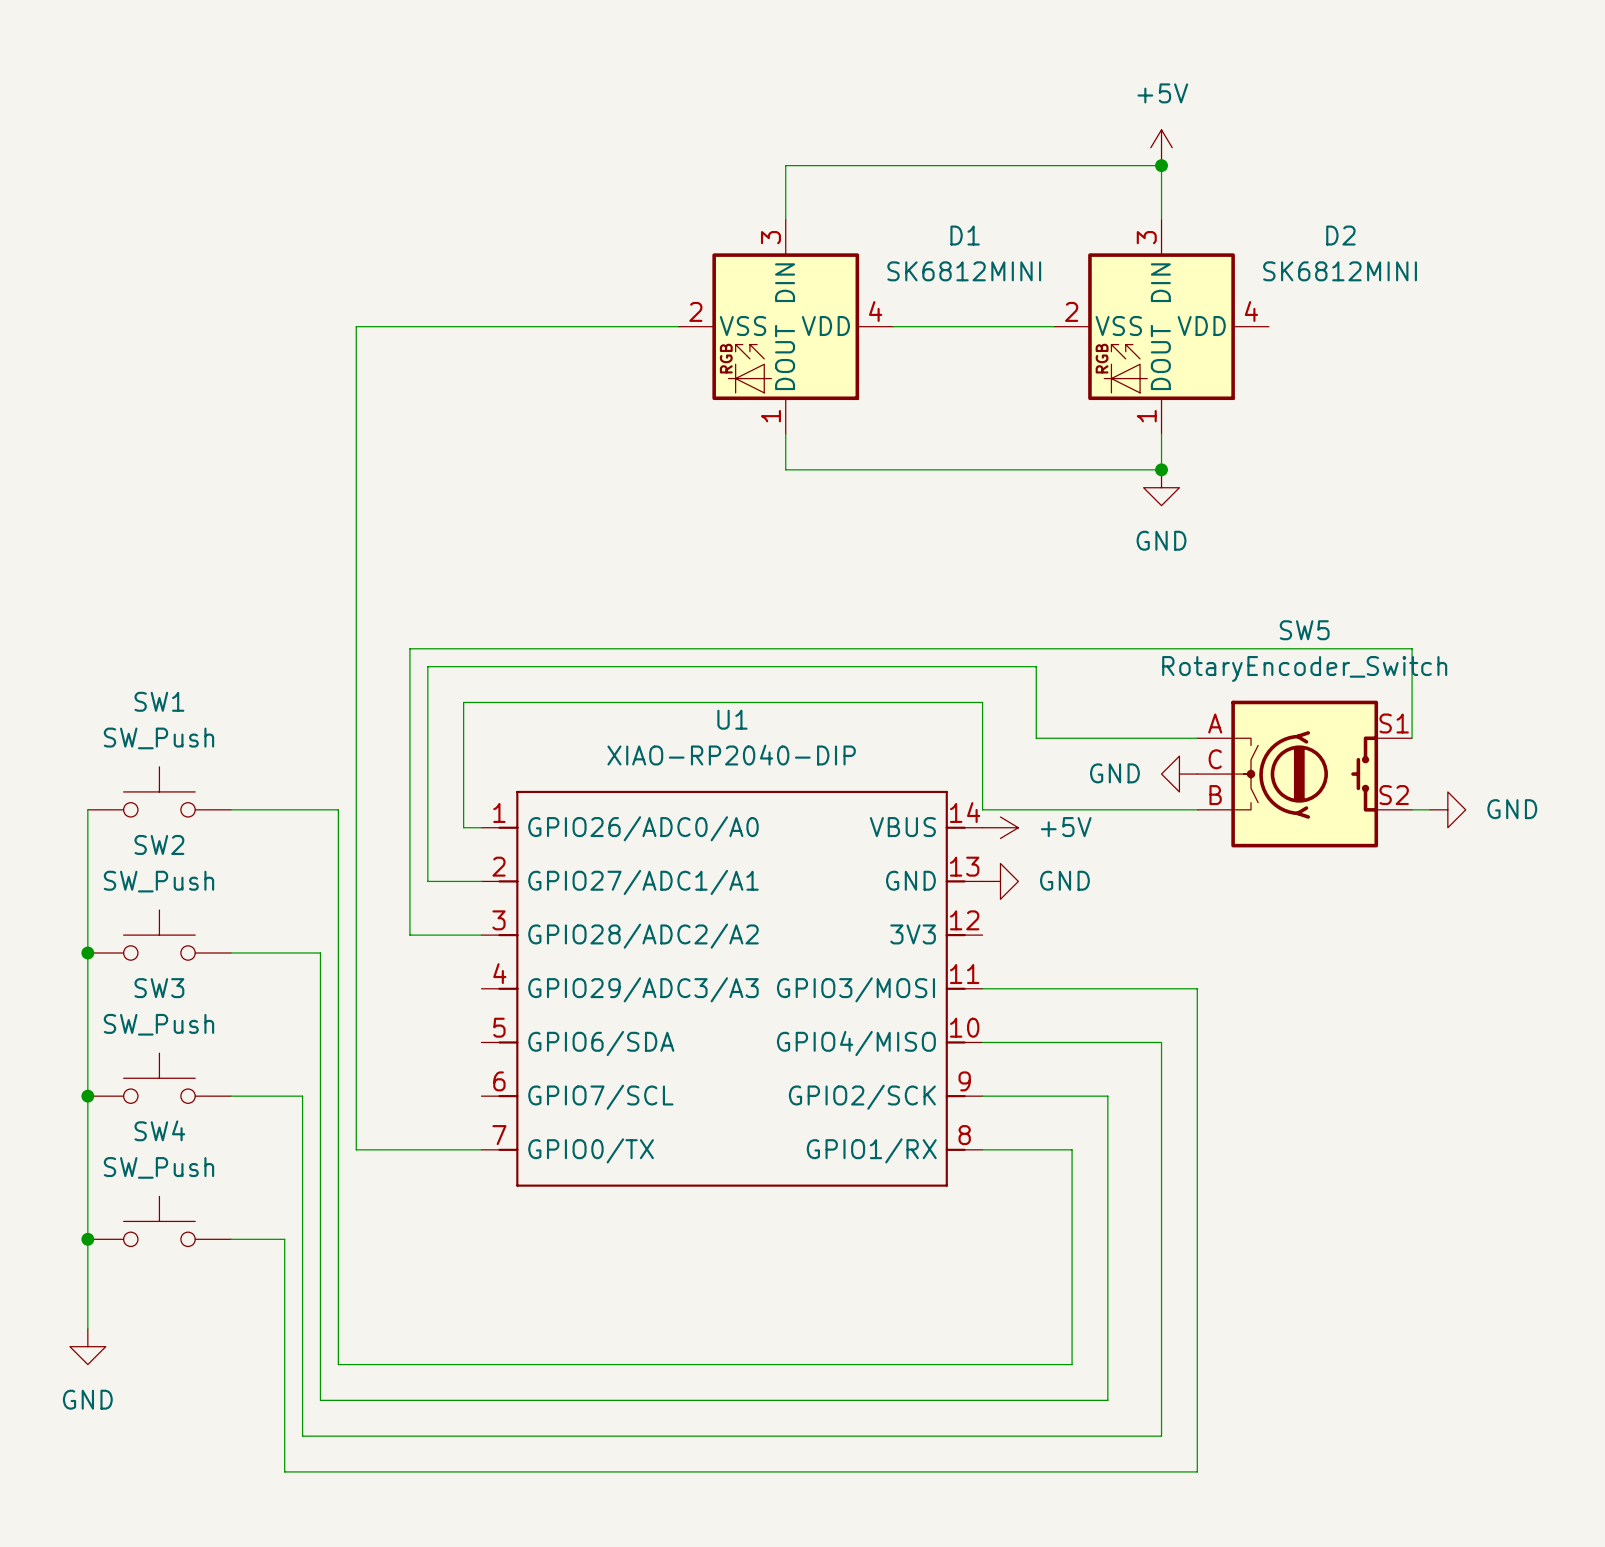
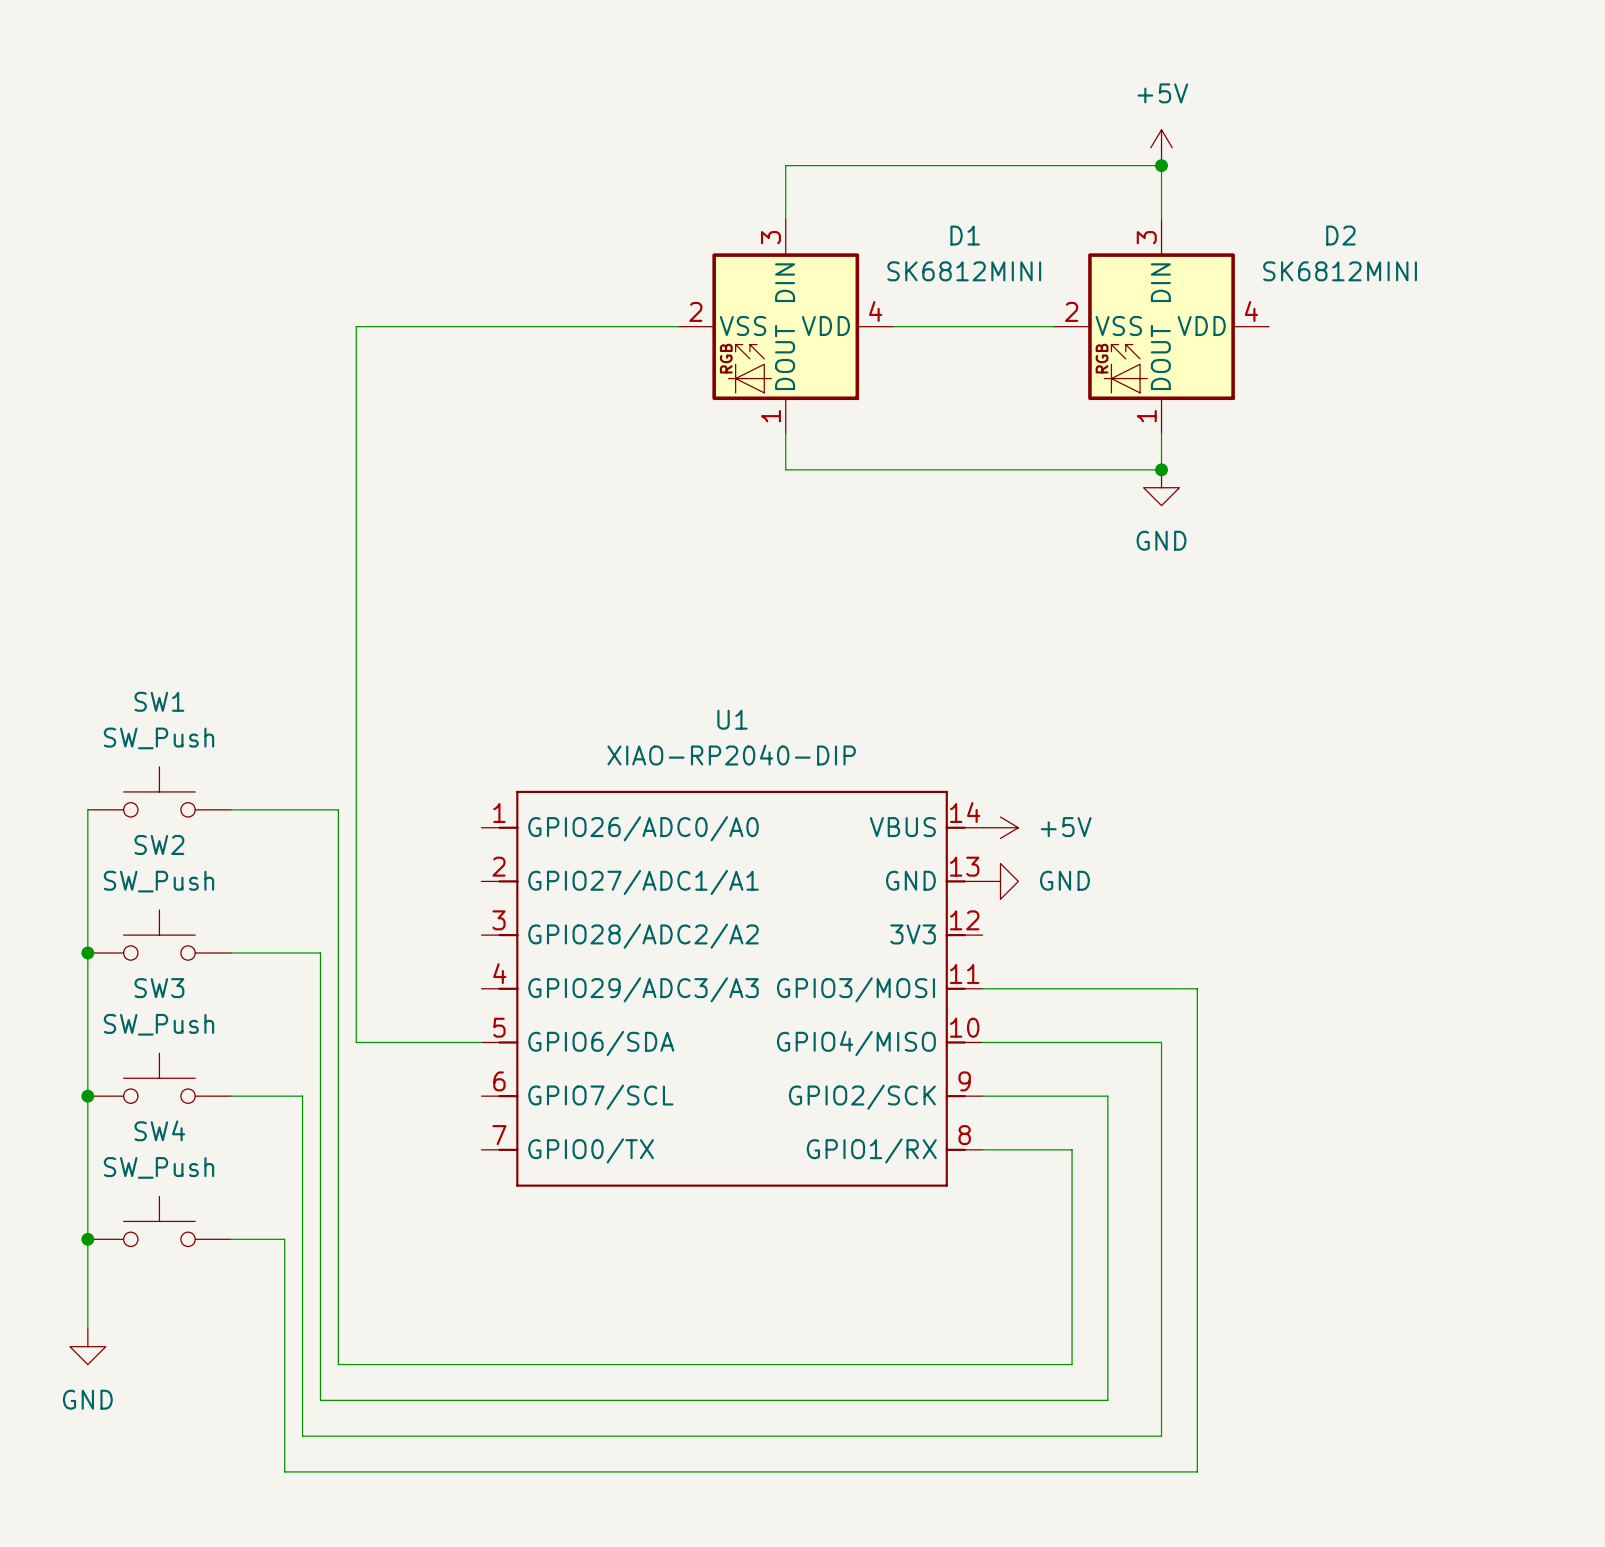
wire: (1197, 738) (1036, 738) (1036, 666) (427, 666) (427, 881) (481, 881) -> none
wire: (1412, 738) (1412, 648) (409, 648) (409, 935) (481, 935) -> none
power symbol: GND (1179, 774) -> none
SW5: RotaryEncoder_Switch (1304, 774) -> none
wire: (1197, 809) (982, 809) (982, 702) (463, 702) (463, 827) (481, 827) -> none
wire: (1412, 809) (1429, 809) -> none
power symbol: GND (1447, 809) -> none
wire: (356, 1042) (356, 1149) (481, 1149) -> (356, 1042) (481, 1042)

